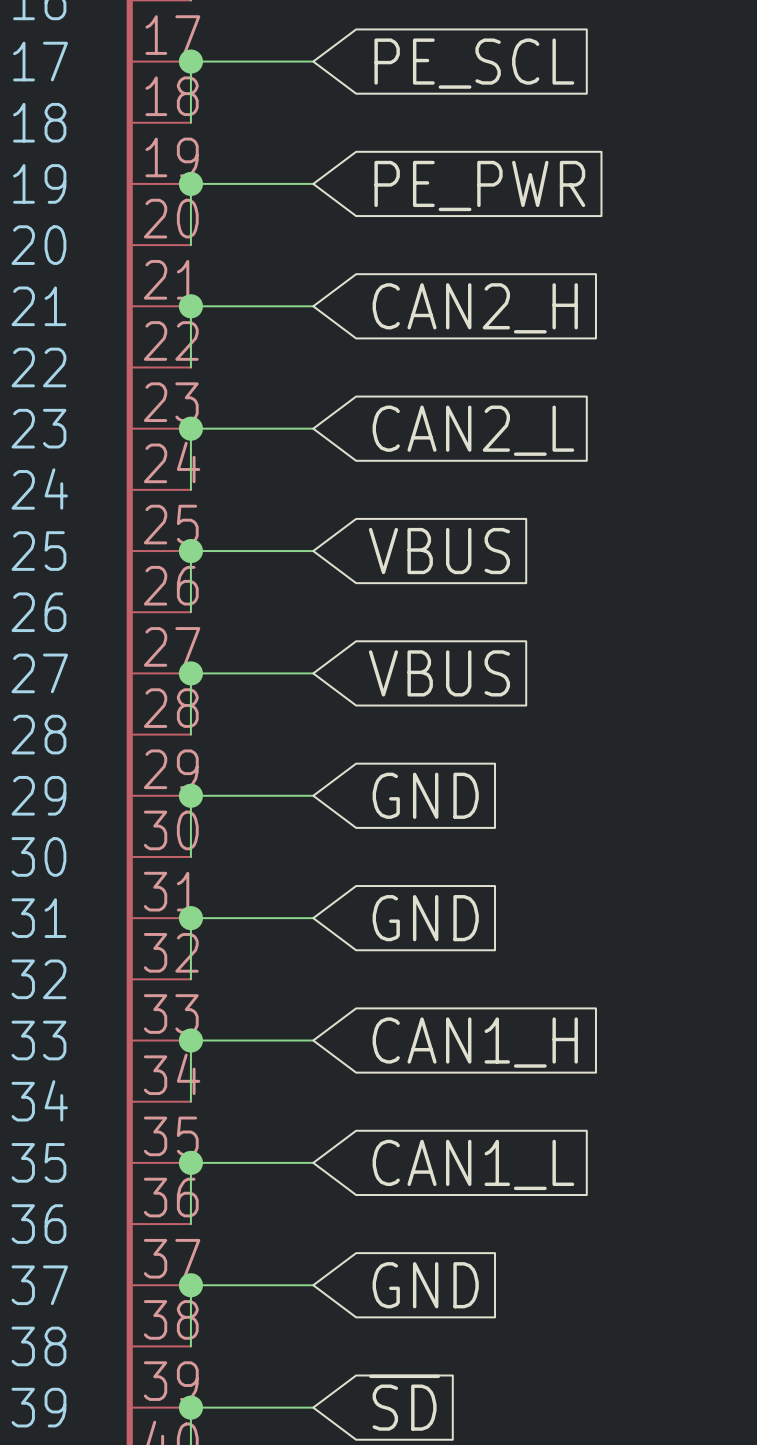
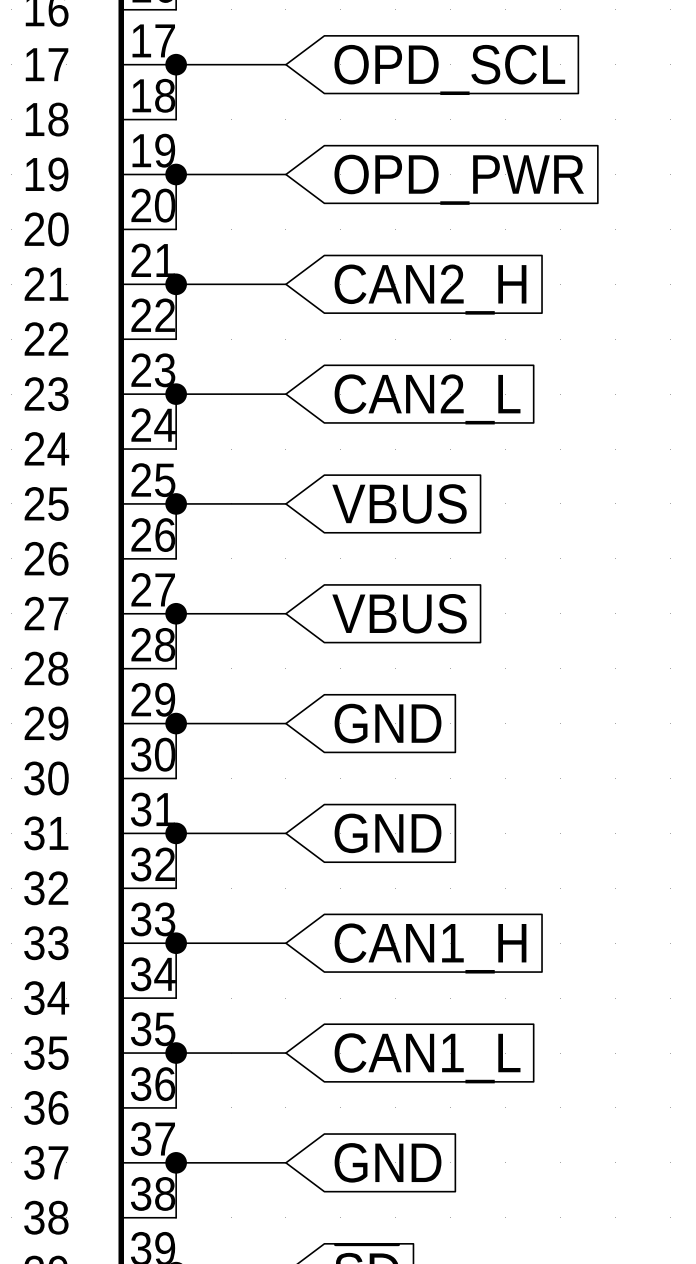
global label: PE_SCL (474, 63) -> OPD_SCL (449, 69)
global label: PE_PWR (479, 185) -> OPD_PWR (459, 179)

